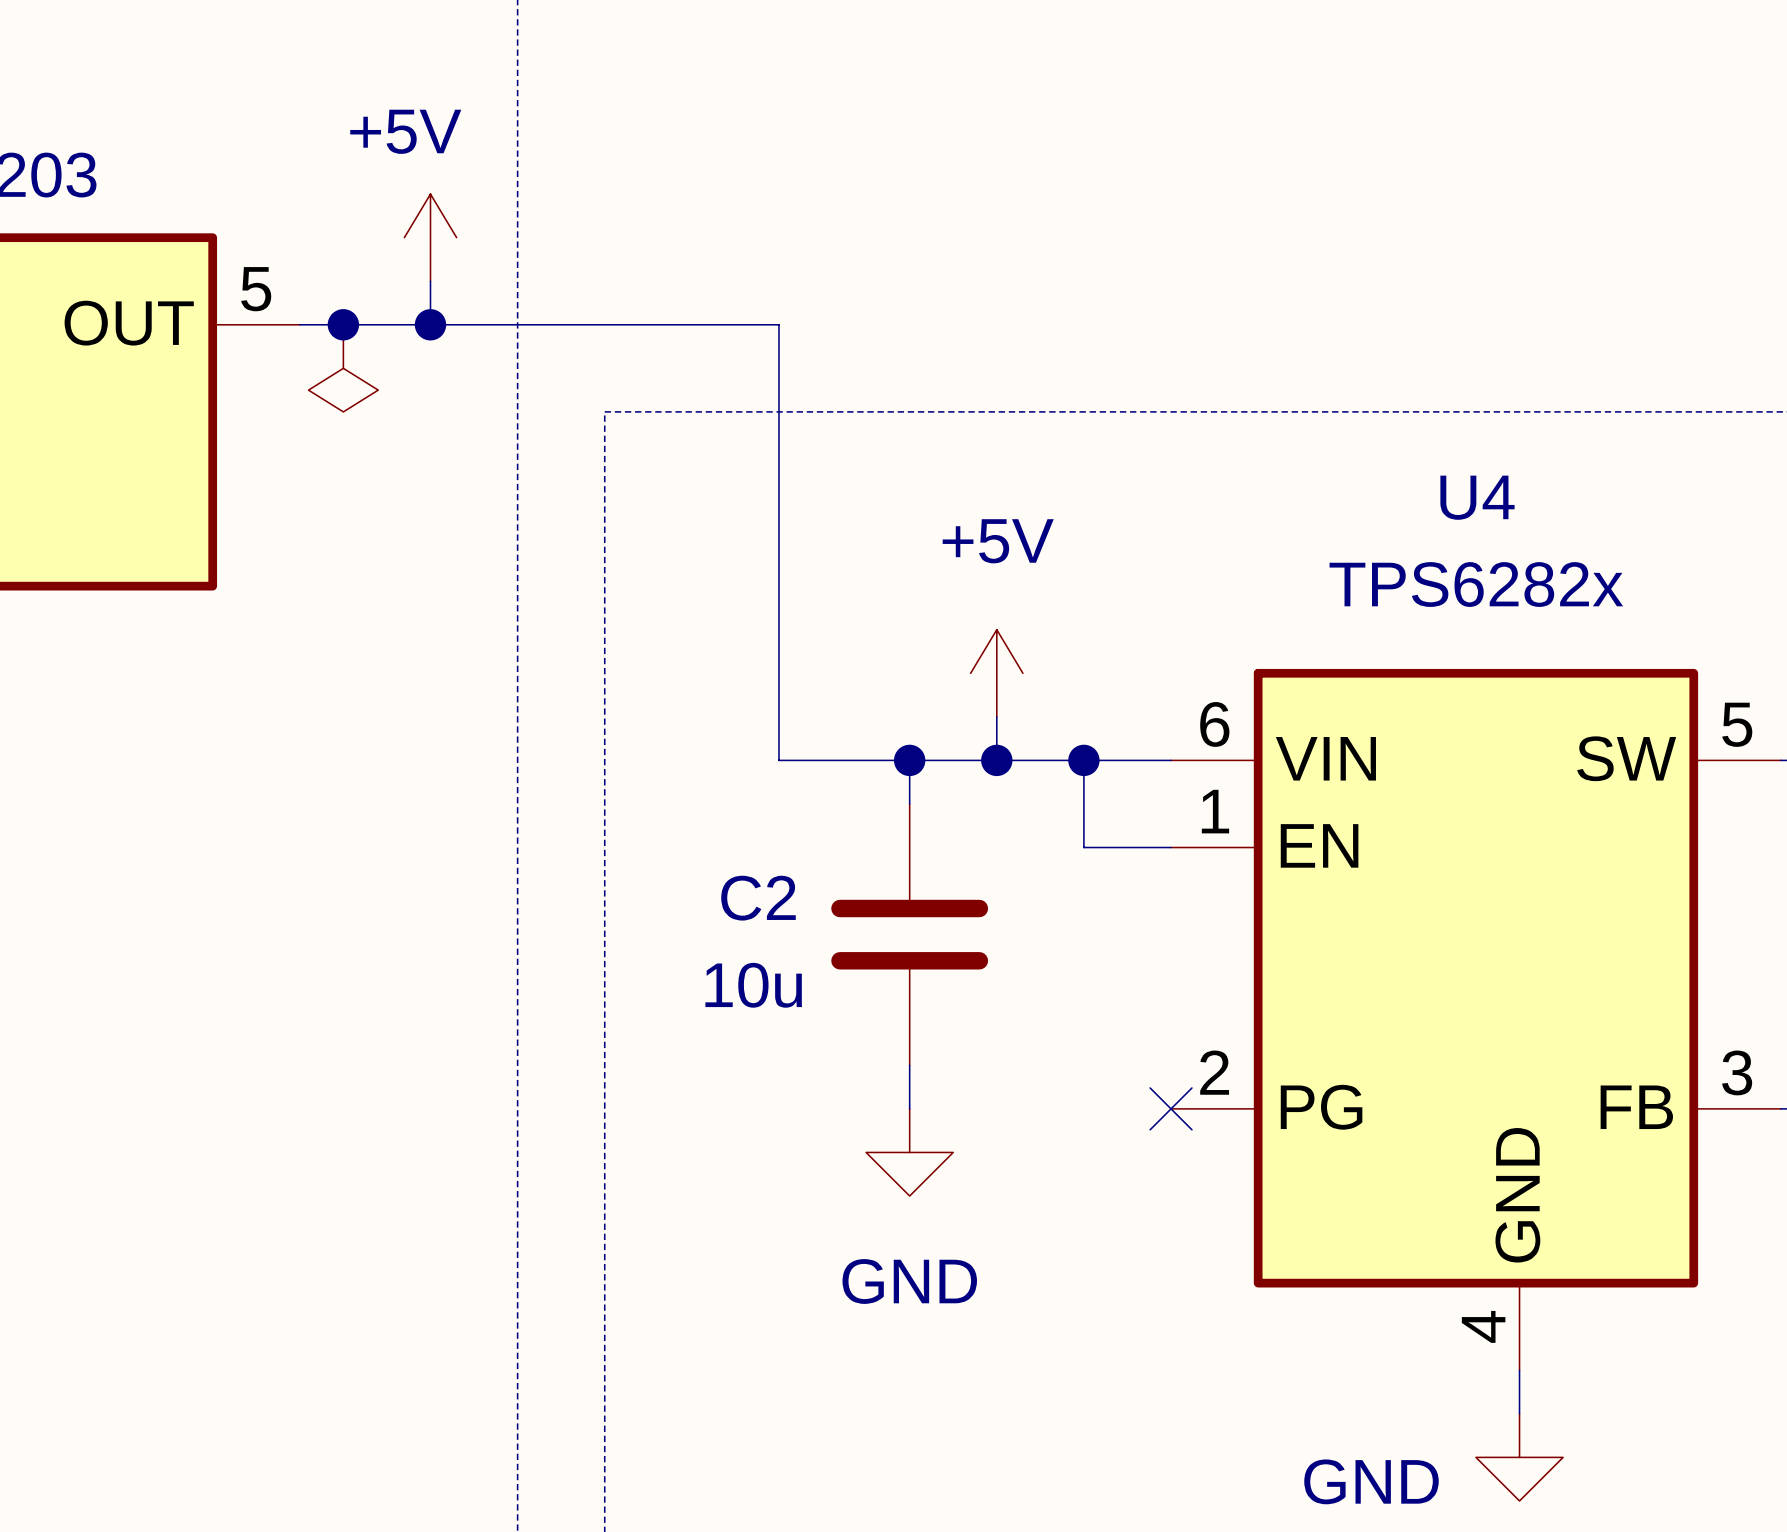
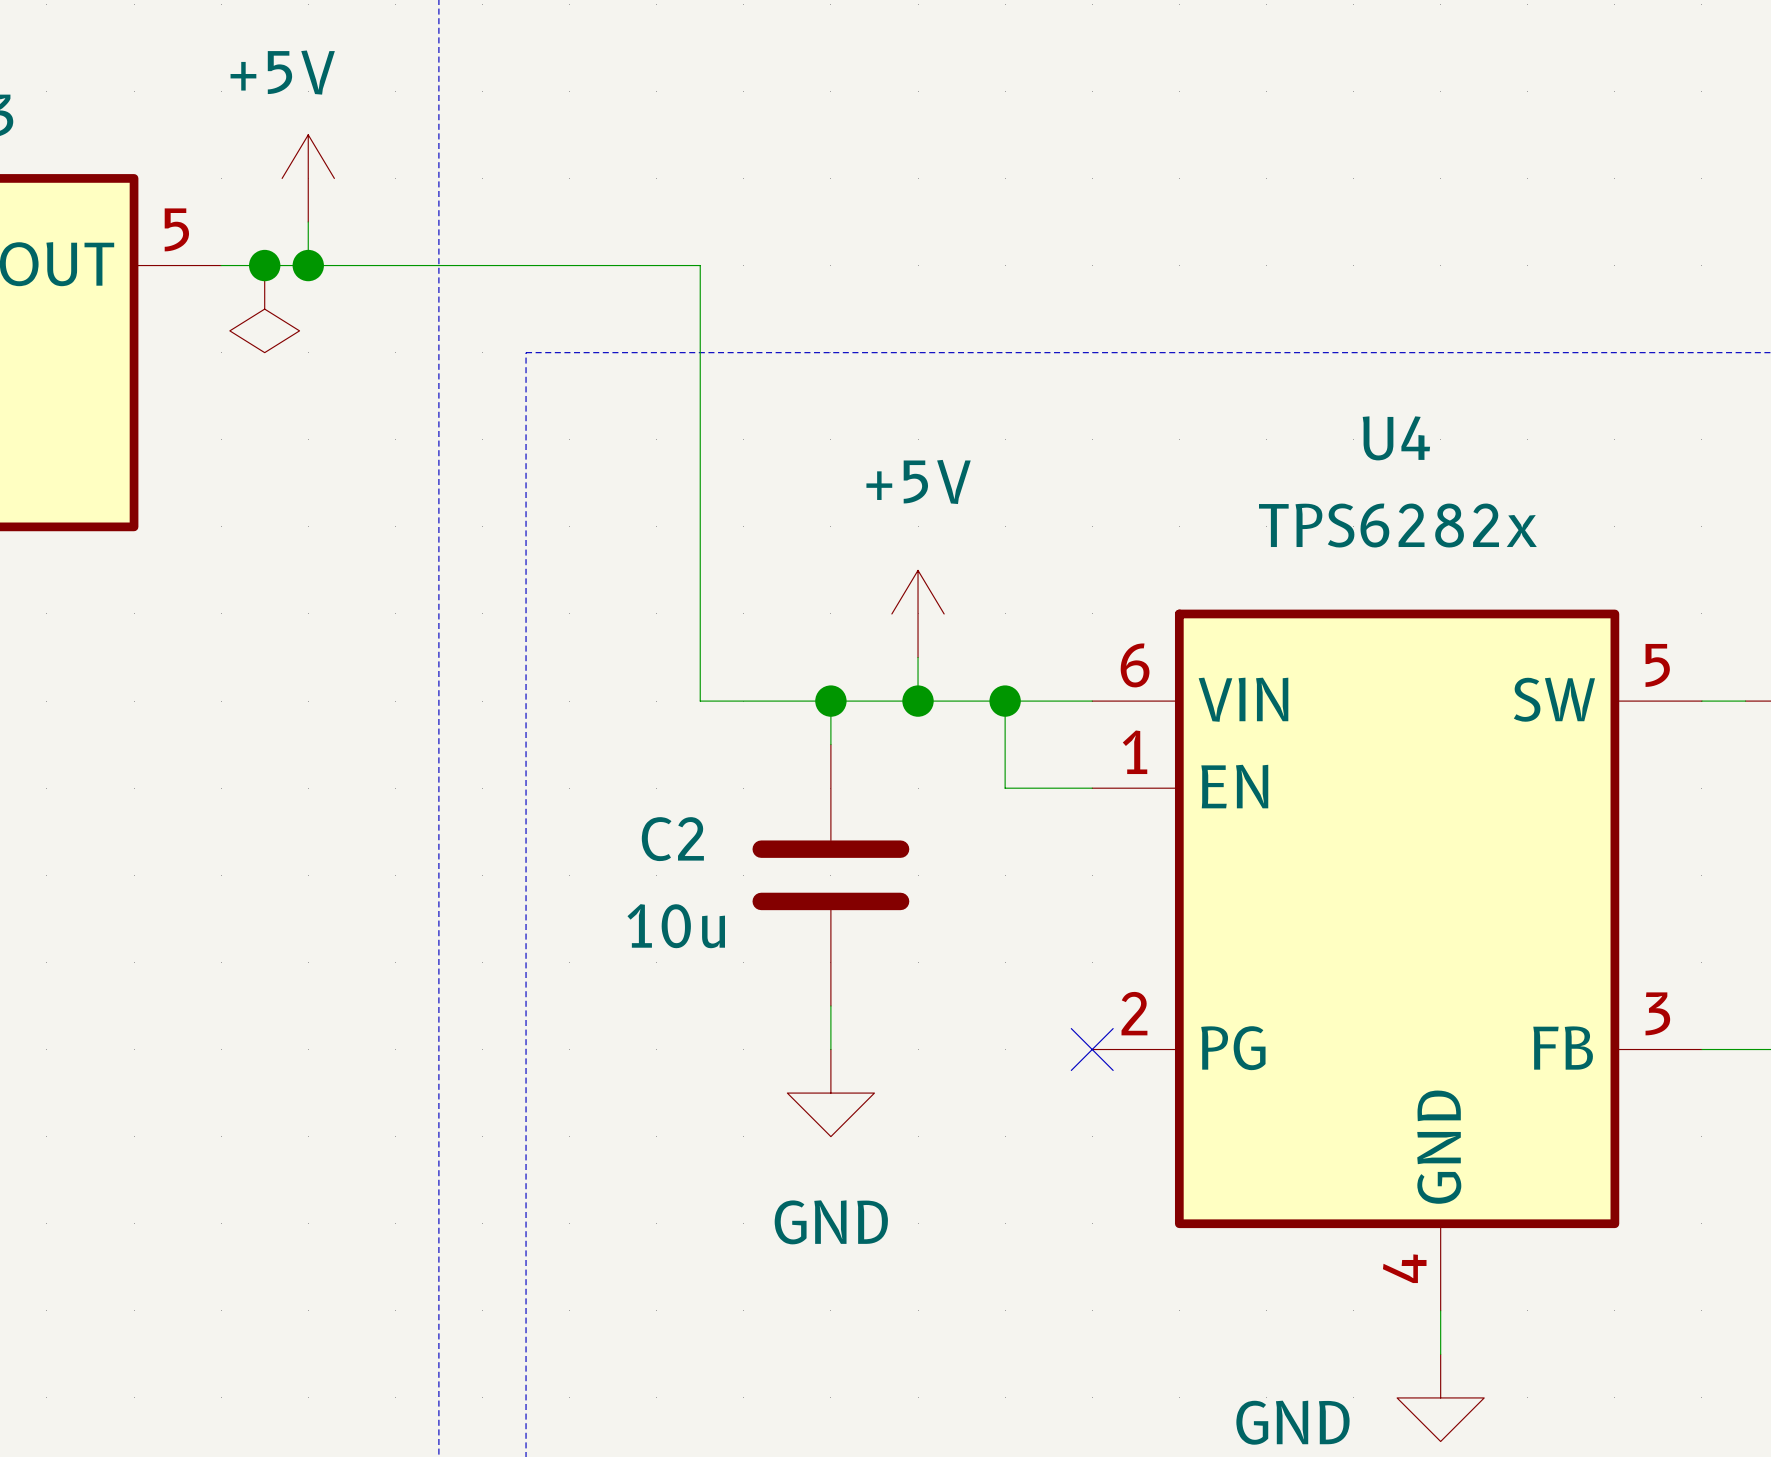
power symbol position: +5V (430, 237) -> +5V (308, 178)
wire: (430, 281) (430, 324) -> (308, 221) (308, 265)
junction position: (430, 324) -> (308, 265)

